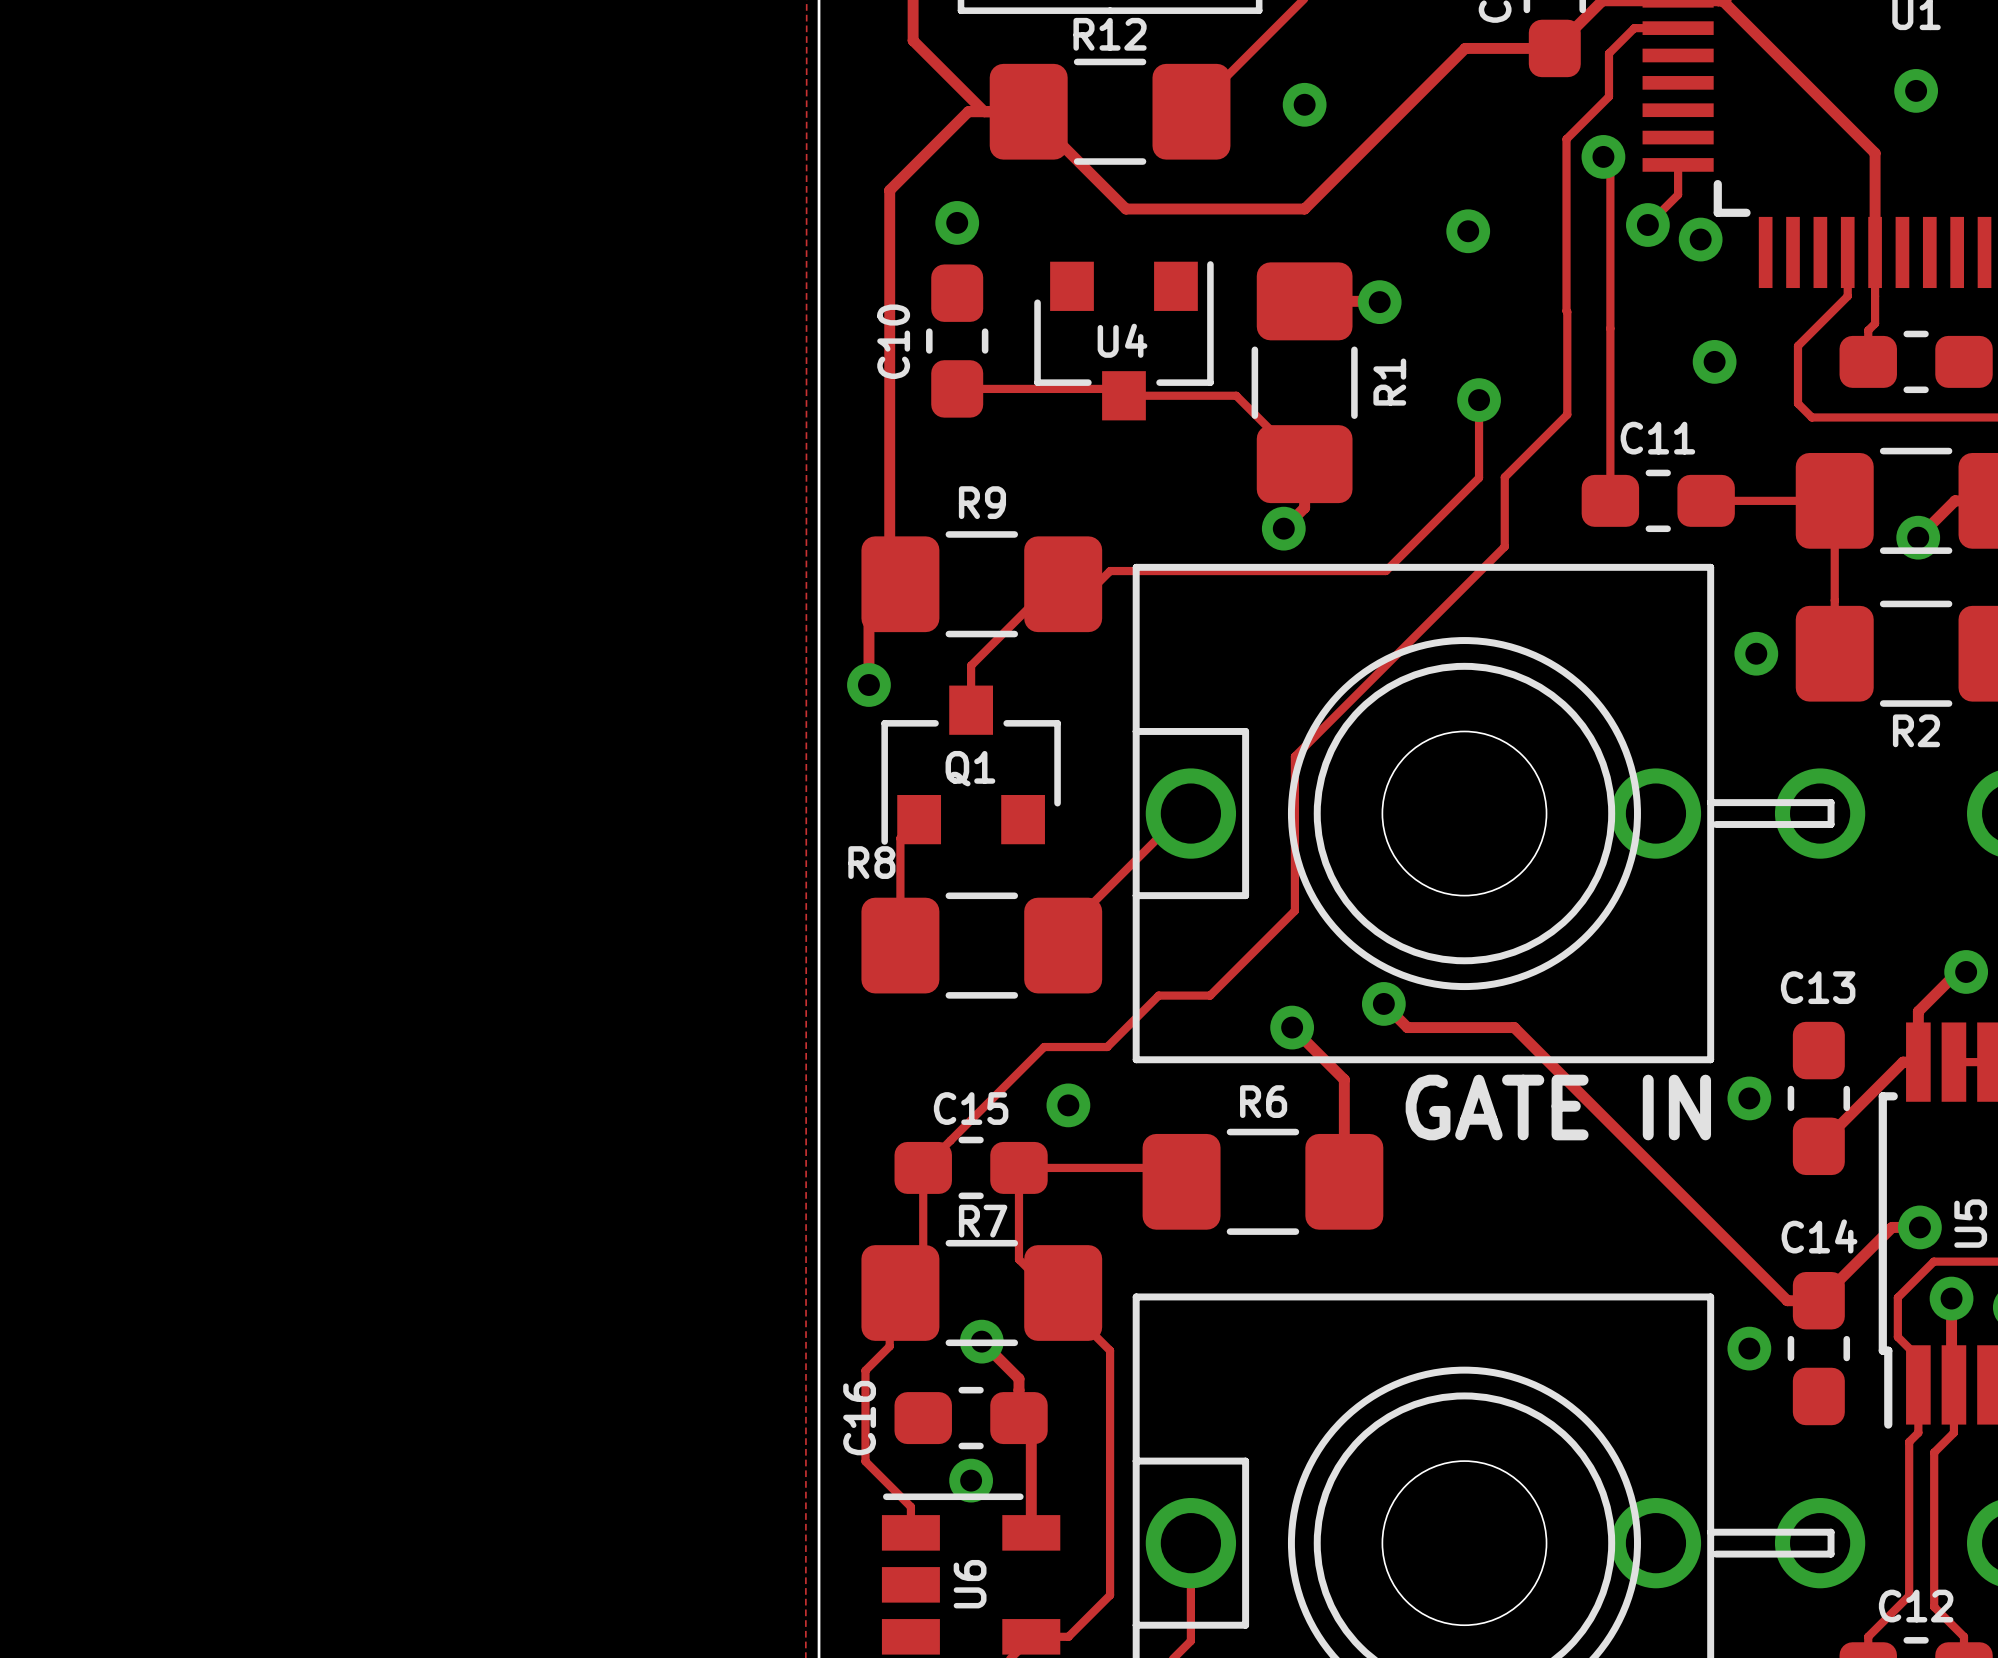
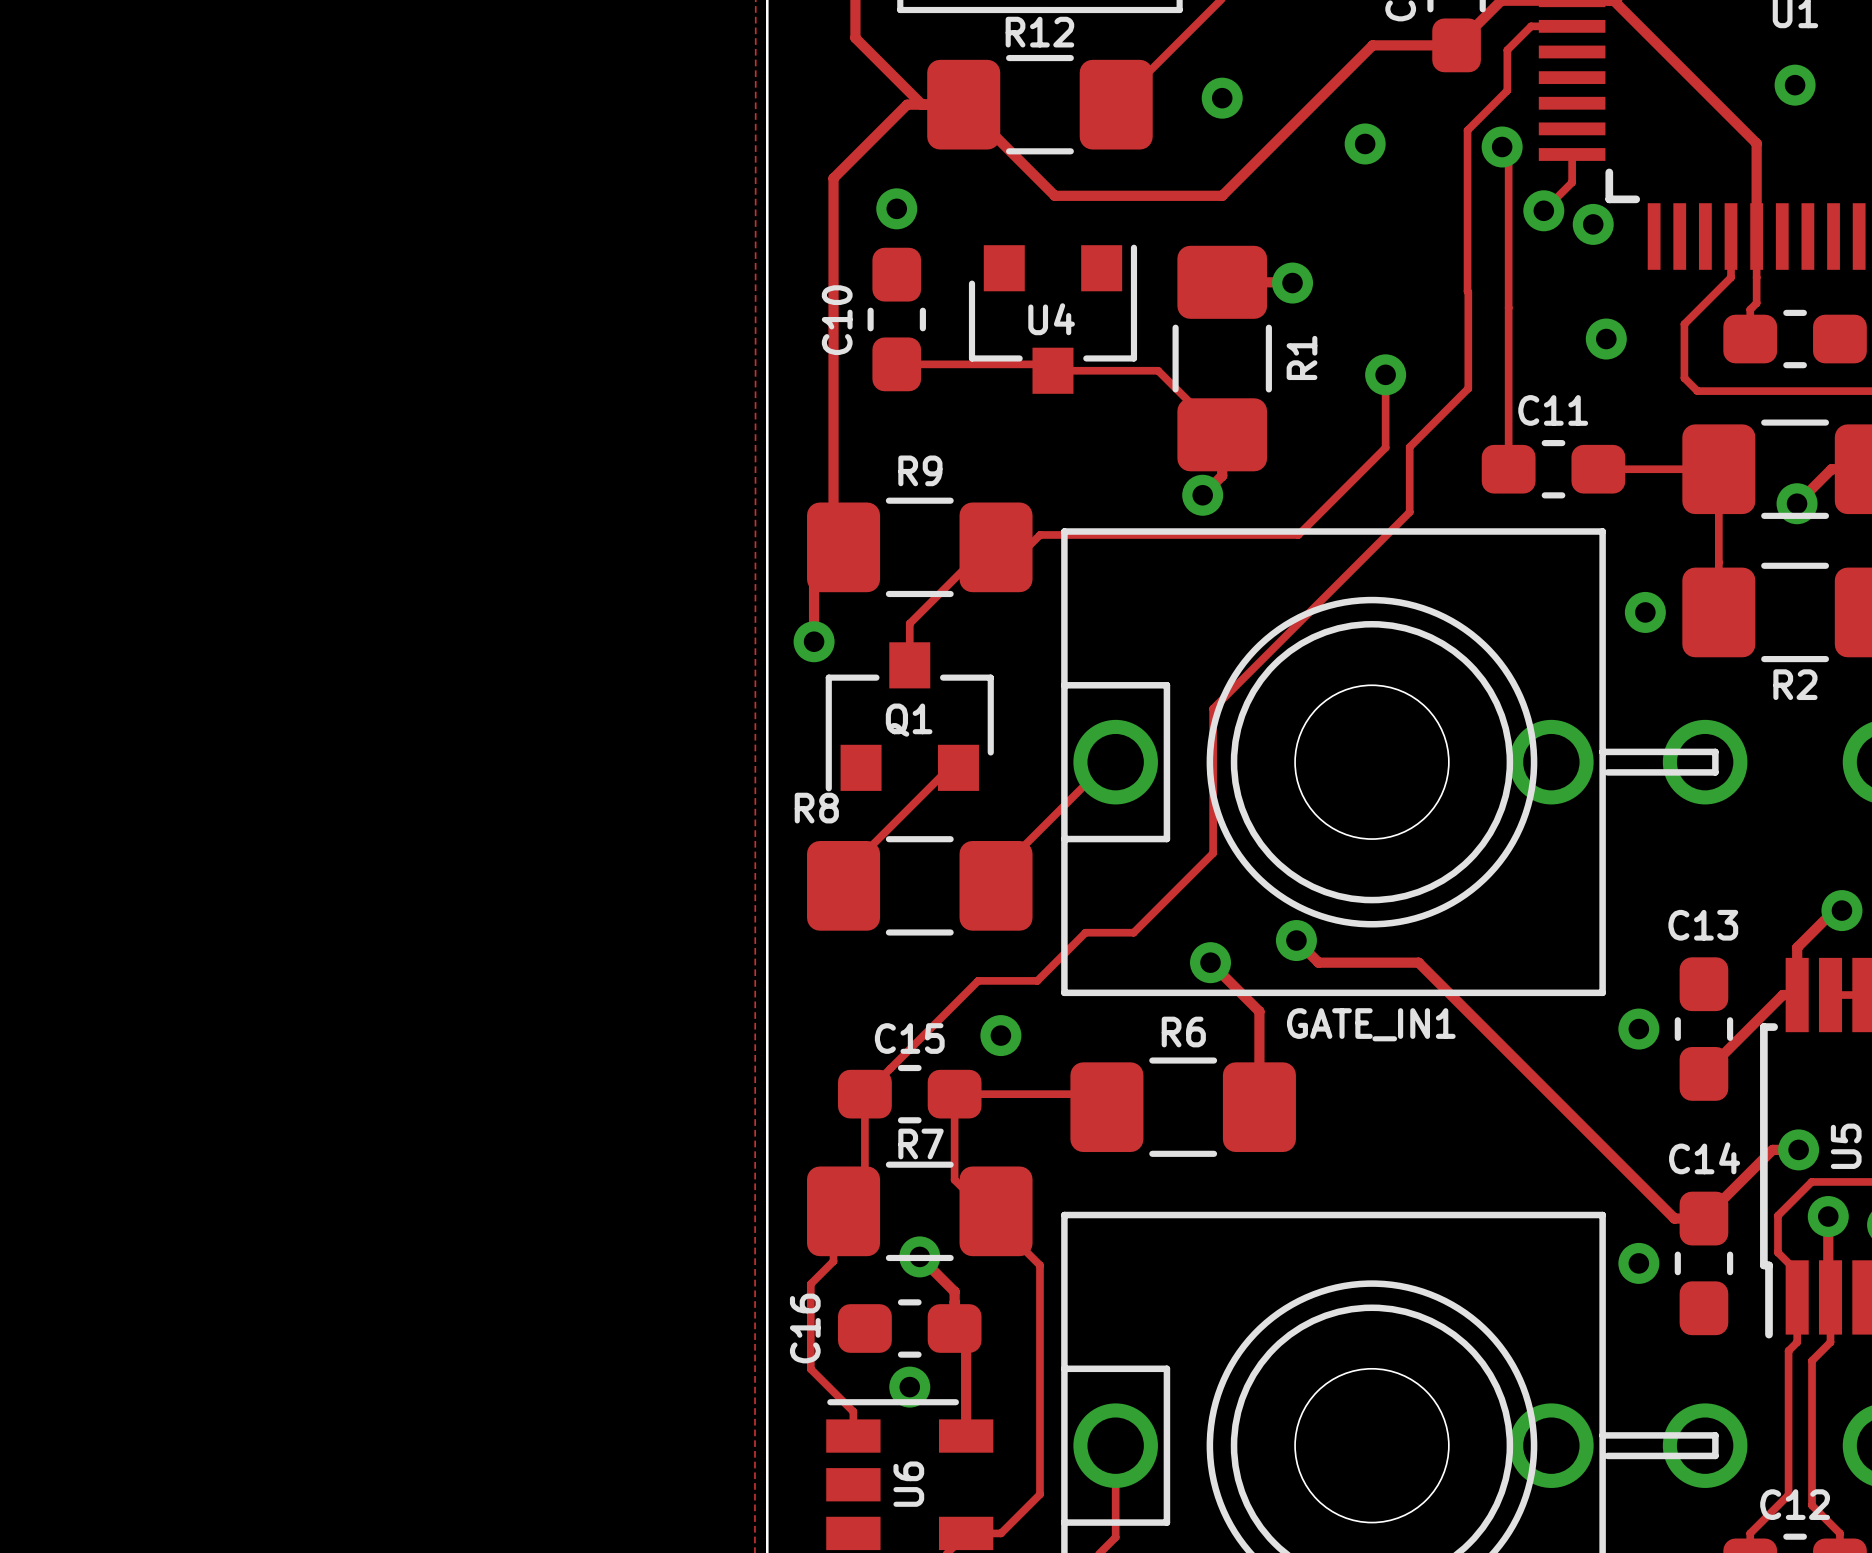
via position: (1468, 231) -> (1365, 143)
track: (919, 819) (900, 838) (900, 945) -> none
track: none -> (949, 767) (831, 885)
GATE_IN1 name: none -> GATE_IN1 (1371, 1024)
text: GATE IN (1558, 1107) -> none

